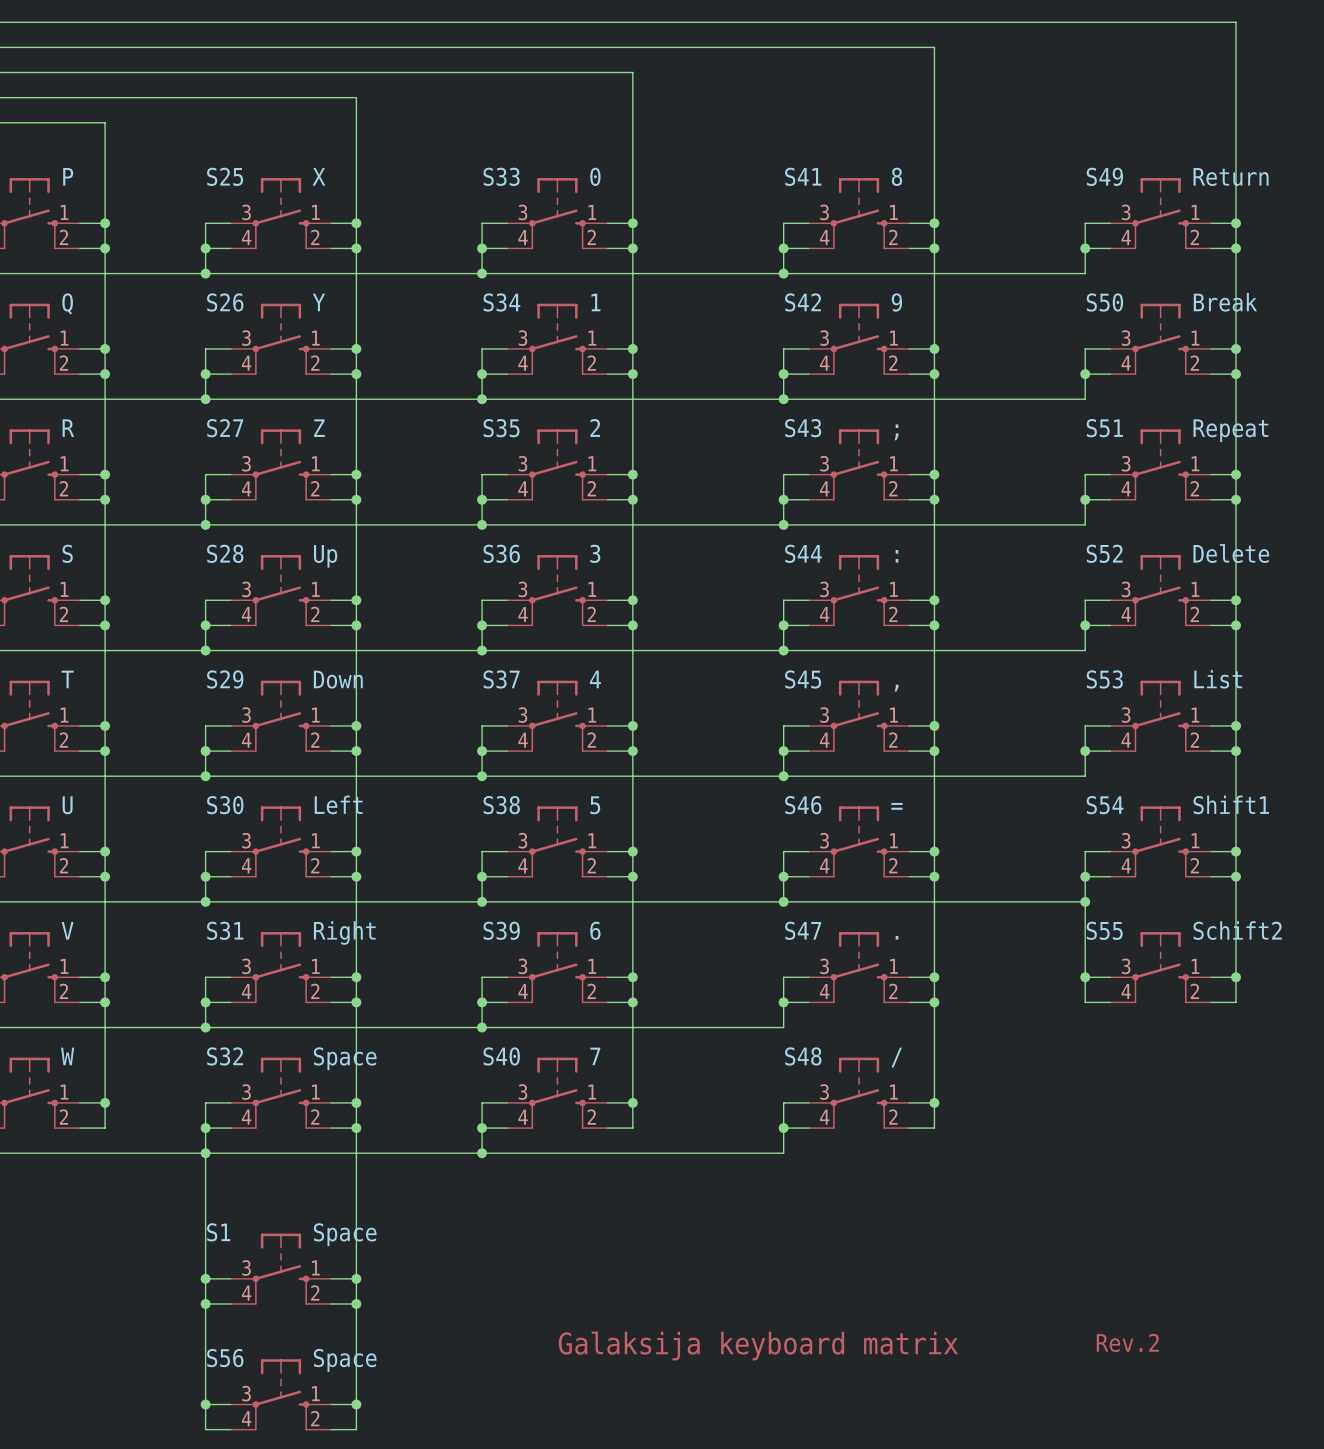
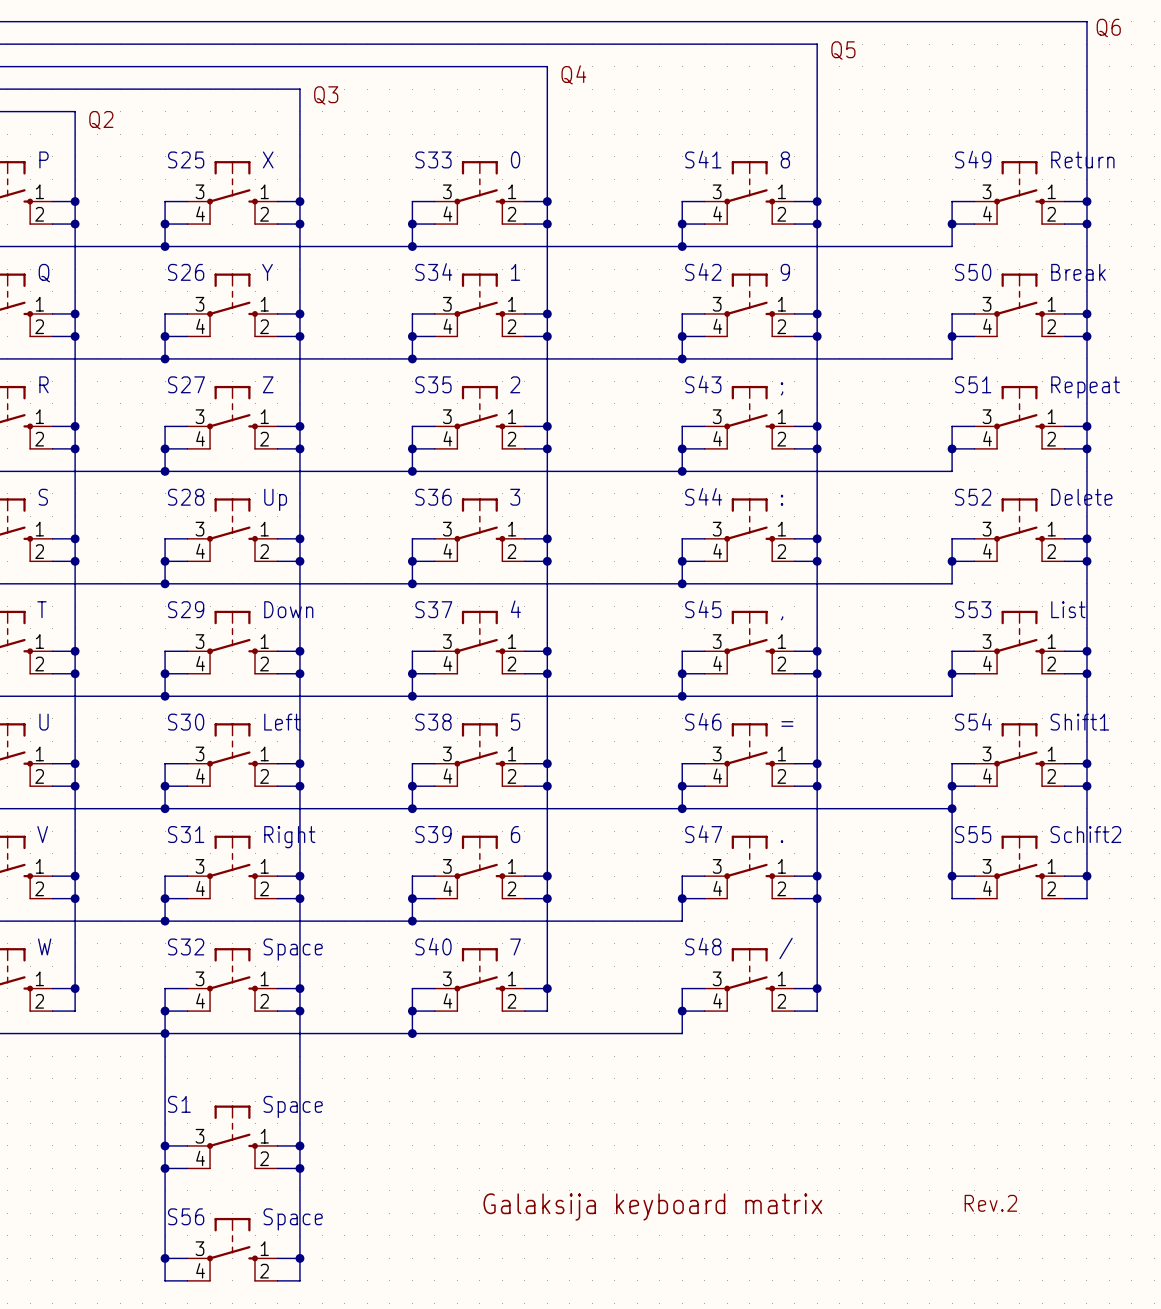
label: none -> Q6 (1108, 28)
label: none -> Q5 (843, 50)
label: none -> Q4 (573, 74)
label: none -> Q3 (326, 95)
label: none -> Q2 (101, 120)

